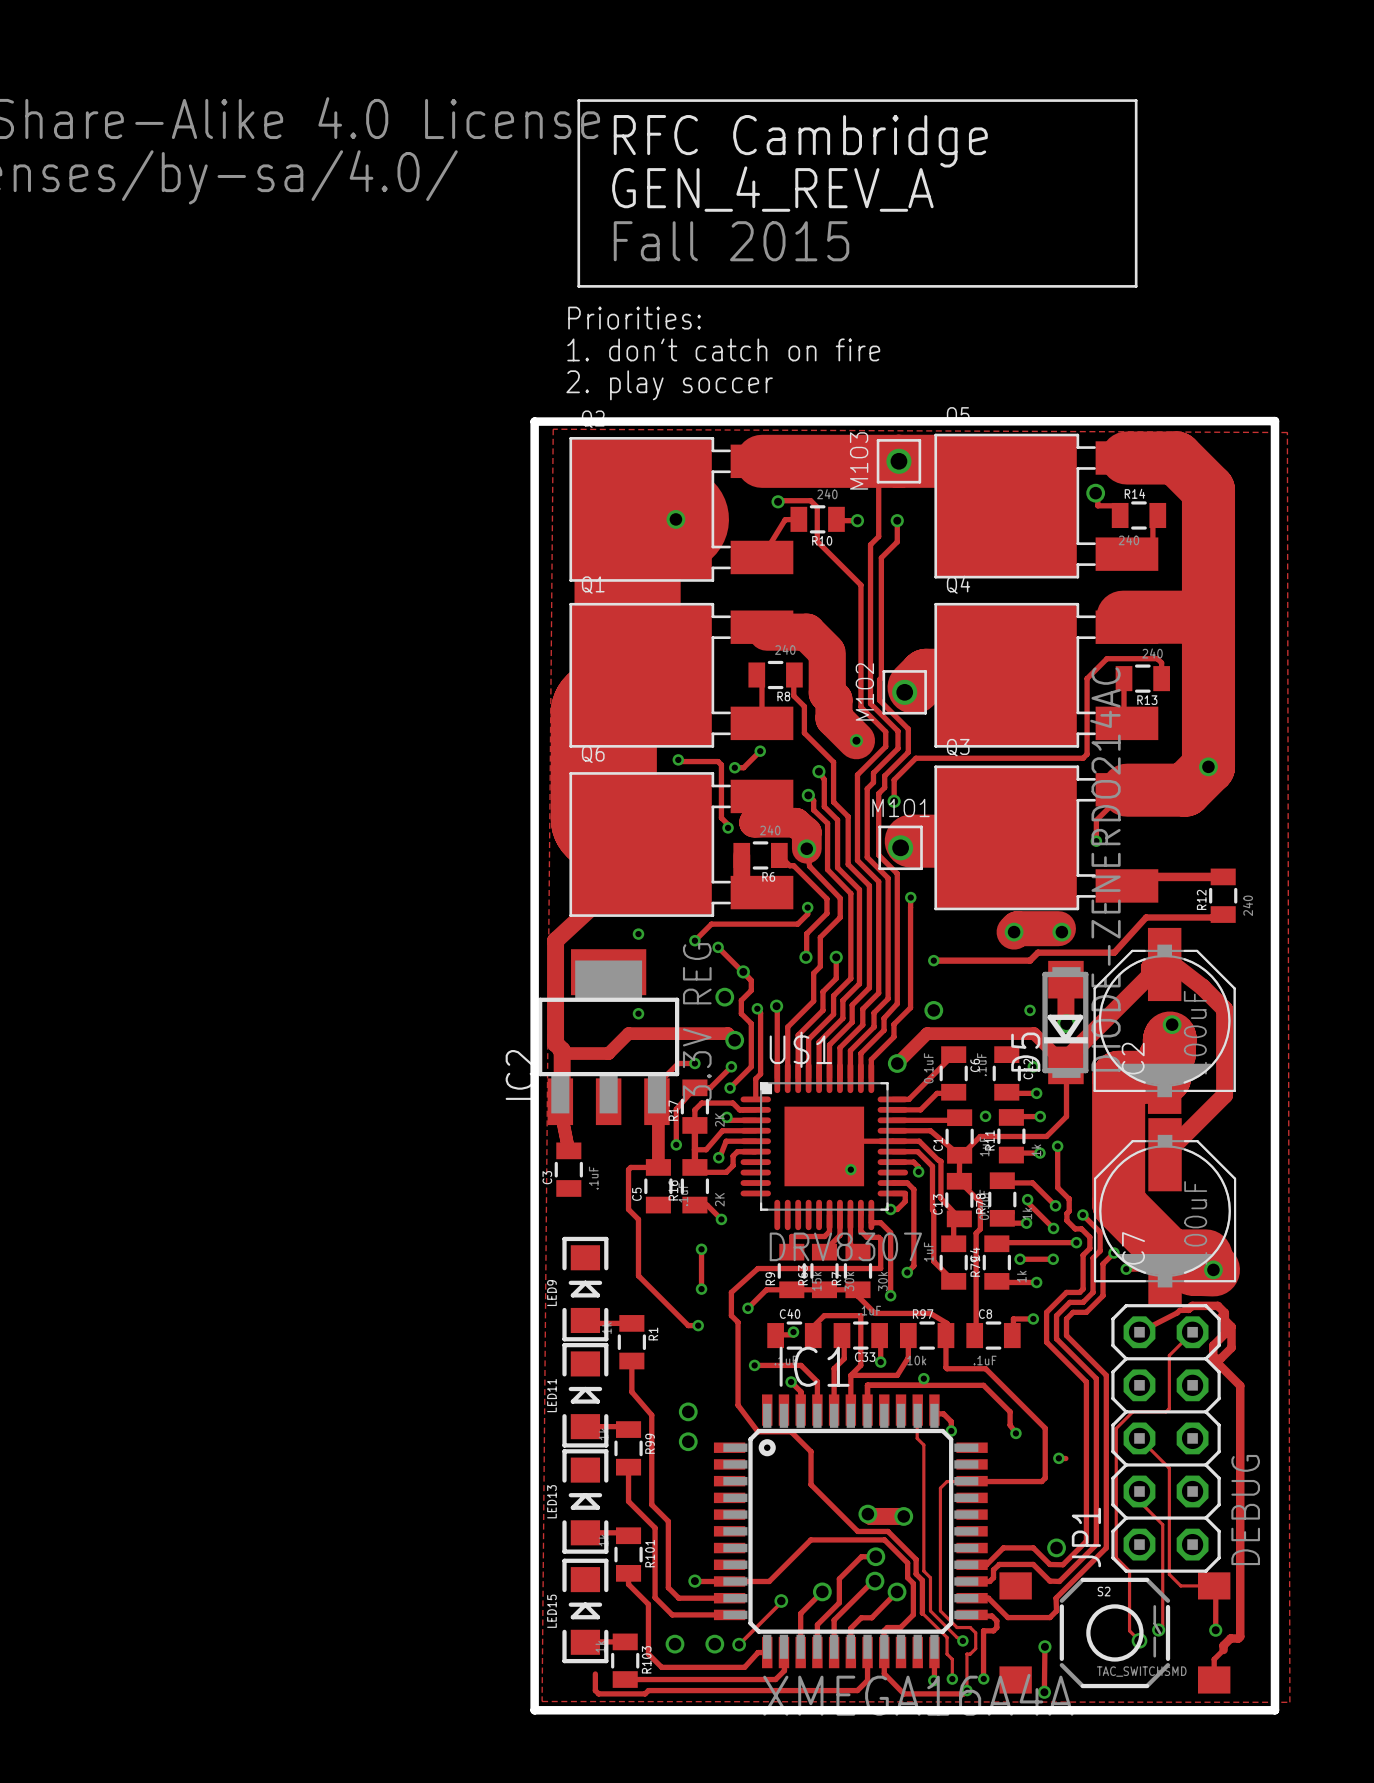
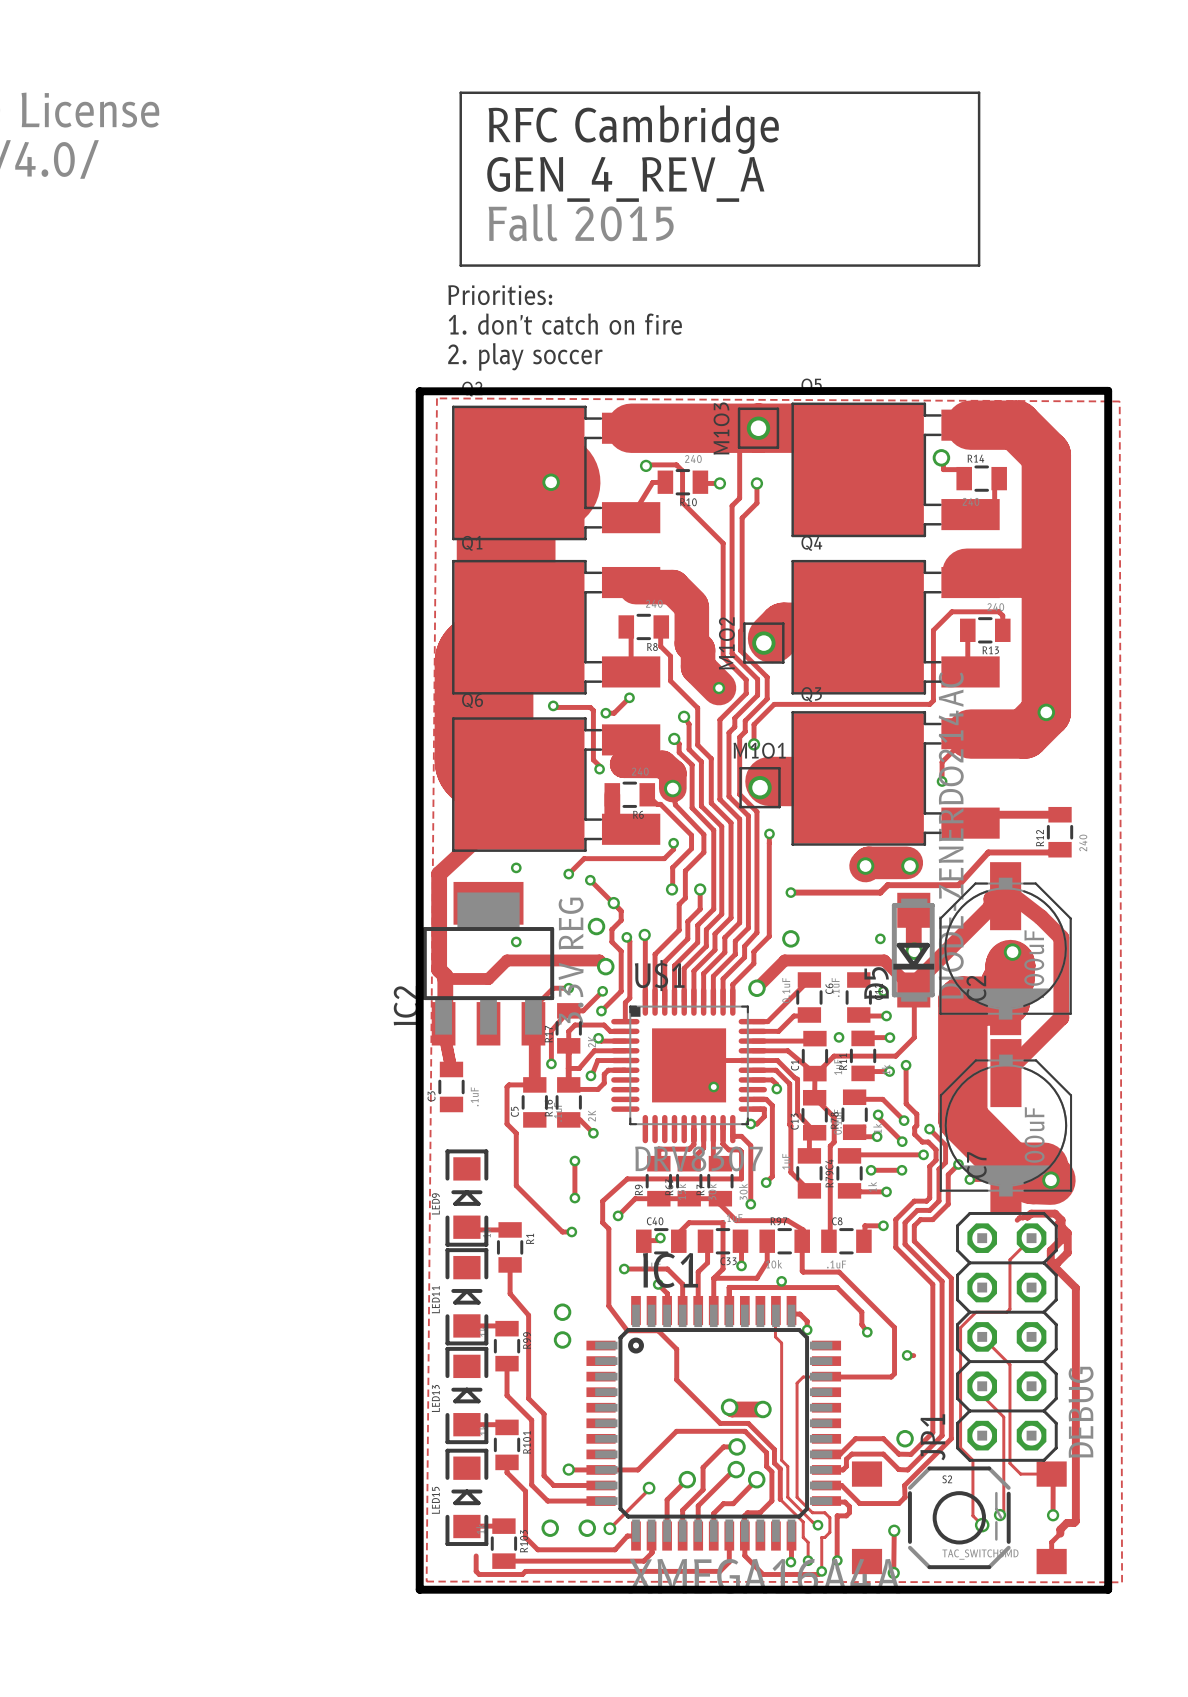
track: (1177, 1312) (1139, 1332) -> none

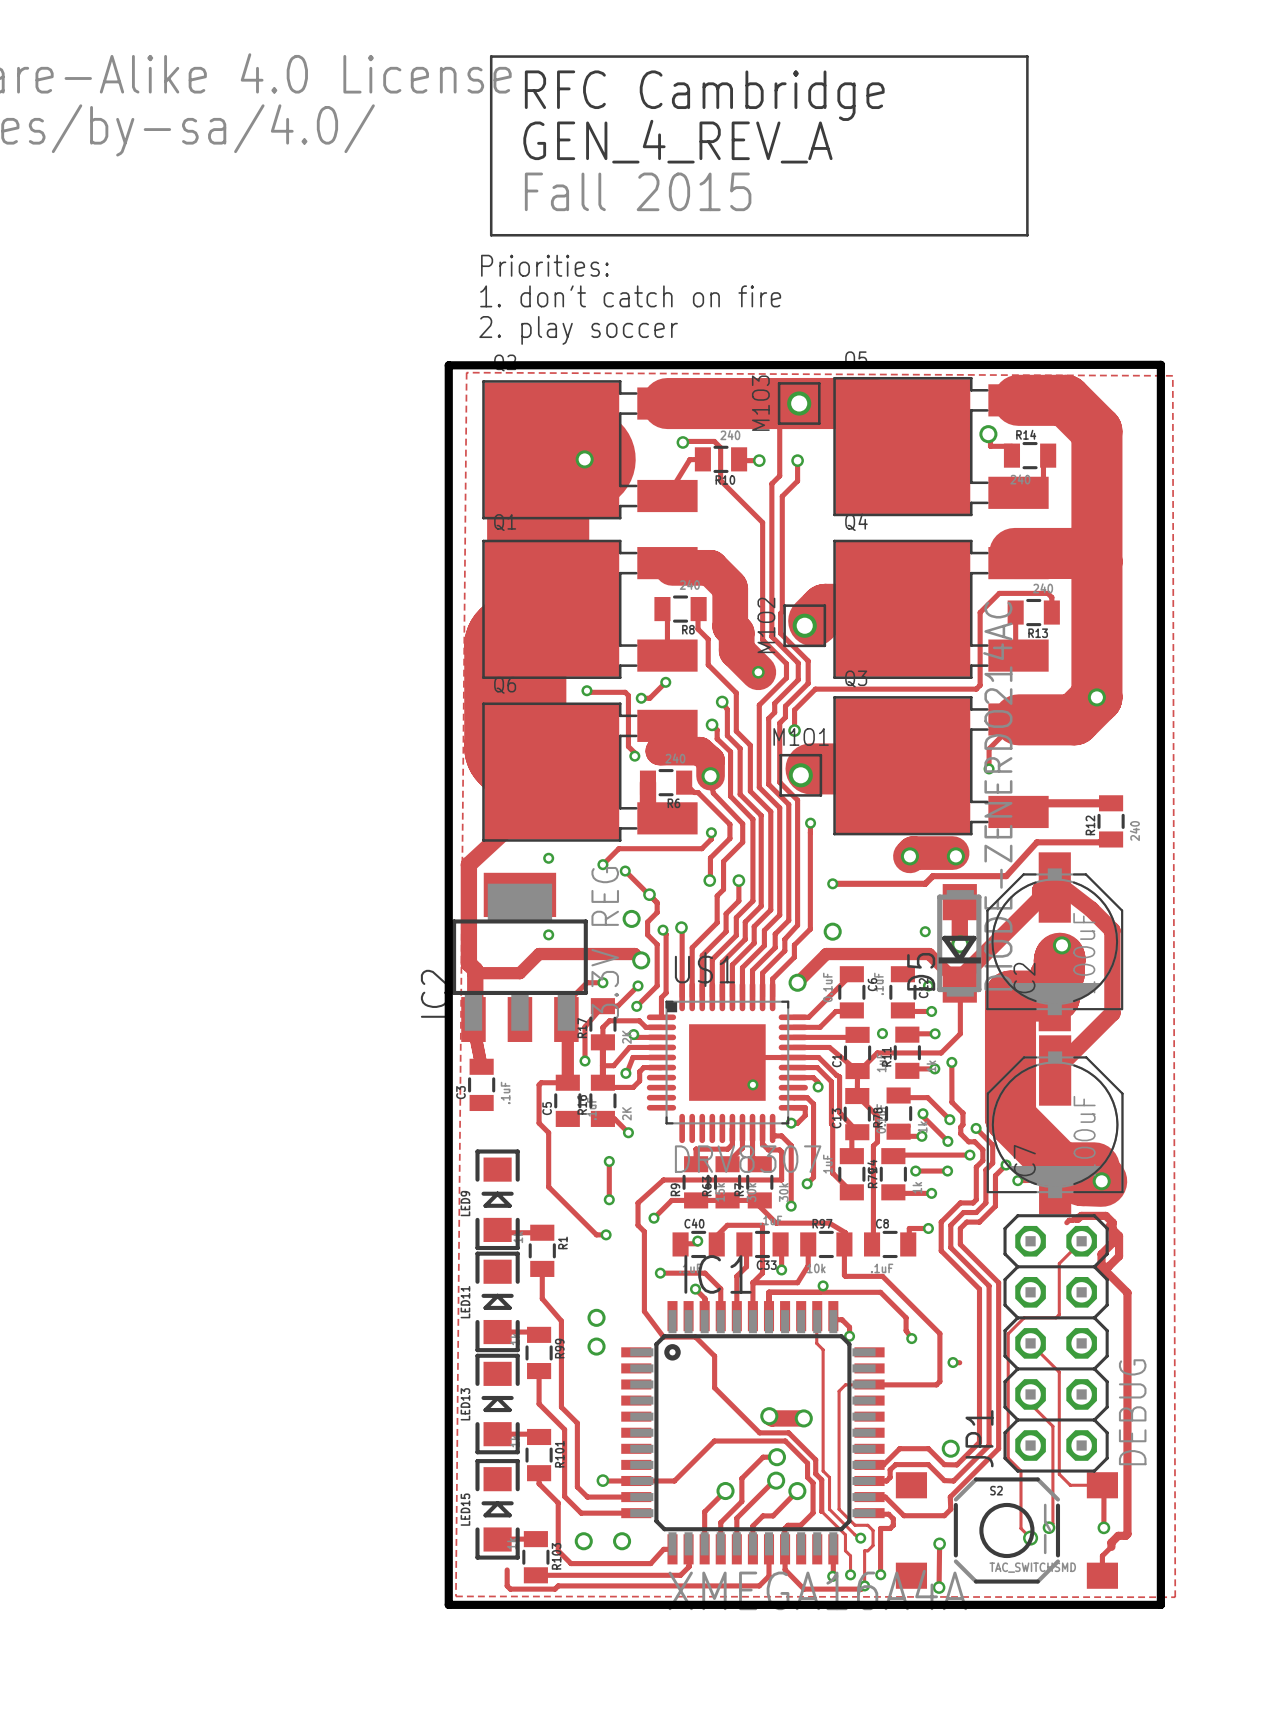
track: (649, 1488) (609, 1528) -> none
via: (649, 1488) -> none
via: (609, 1528) -> none

